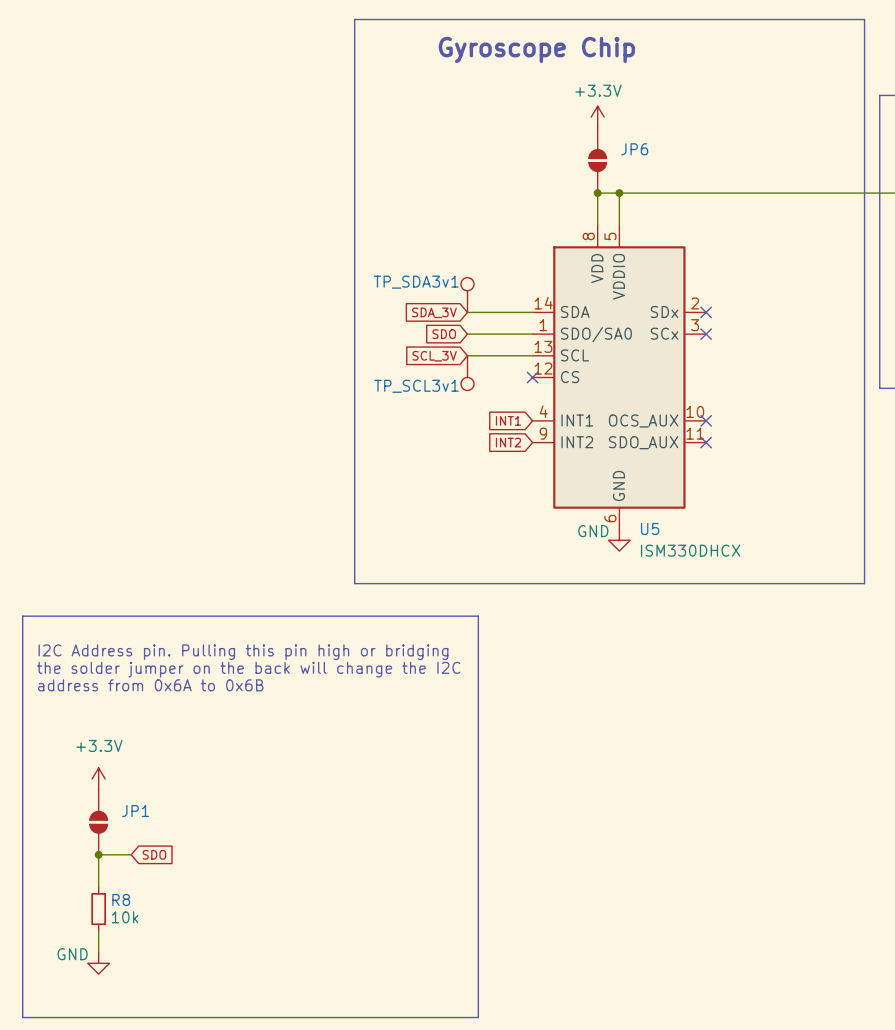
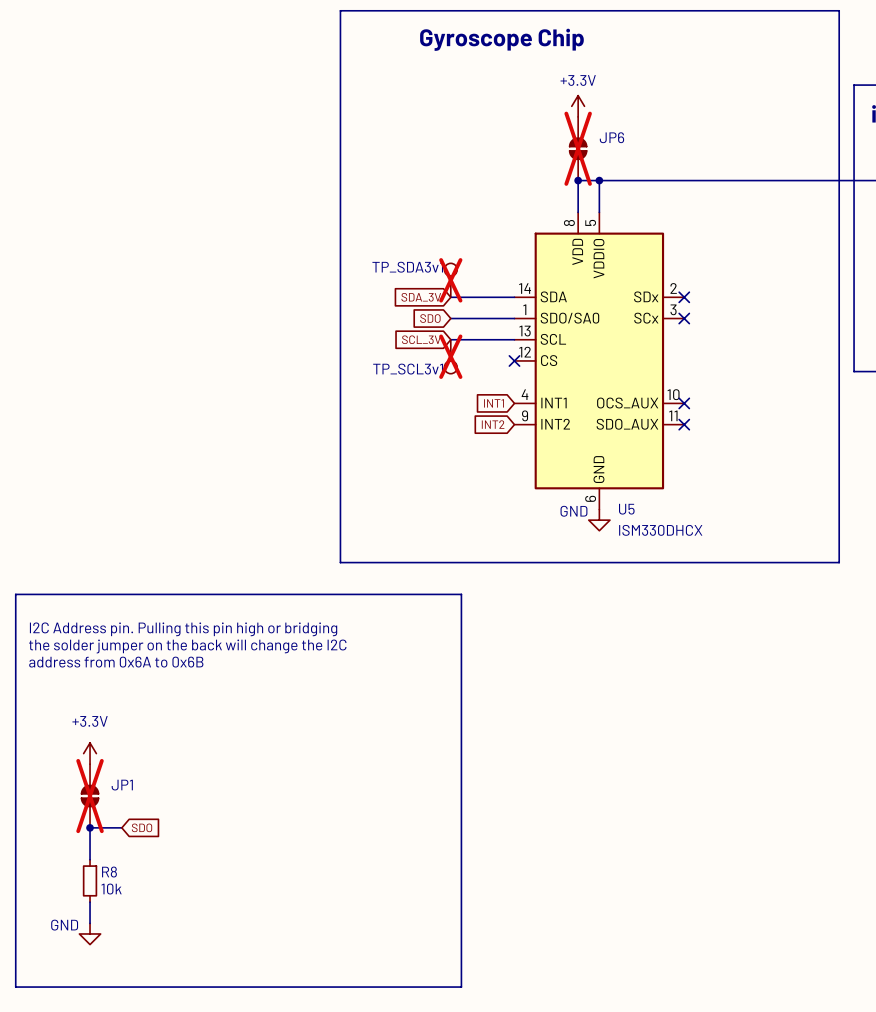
JP6 do-not-place cross: none -> (578, 148)
TP_SDA3v1 do-not-place cross: none -> (450, 280)
TP_SCL3v1 do-not-place cross: none -> (450, 356)
JP1 do-not-place cross: none -> (90, 796)

